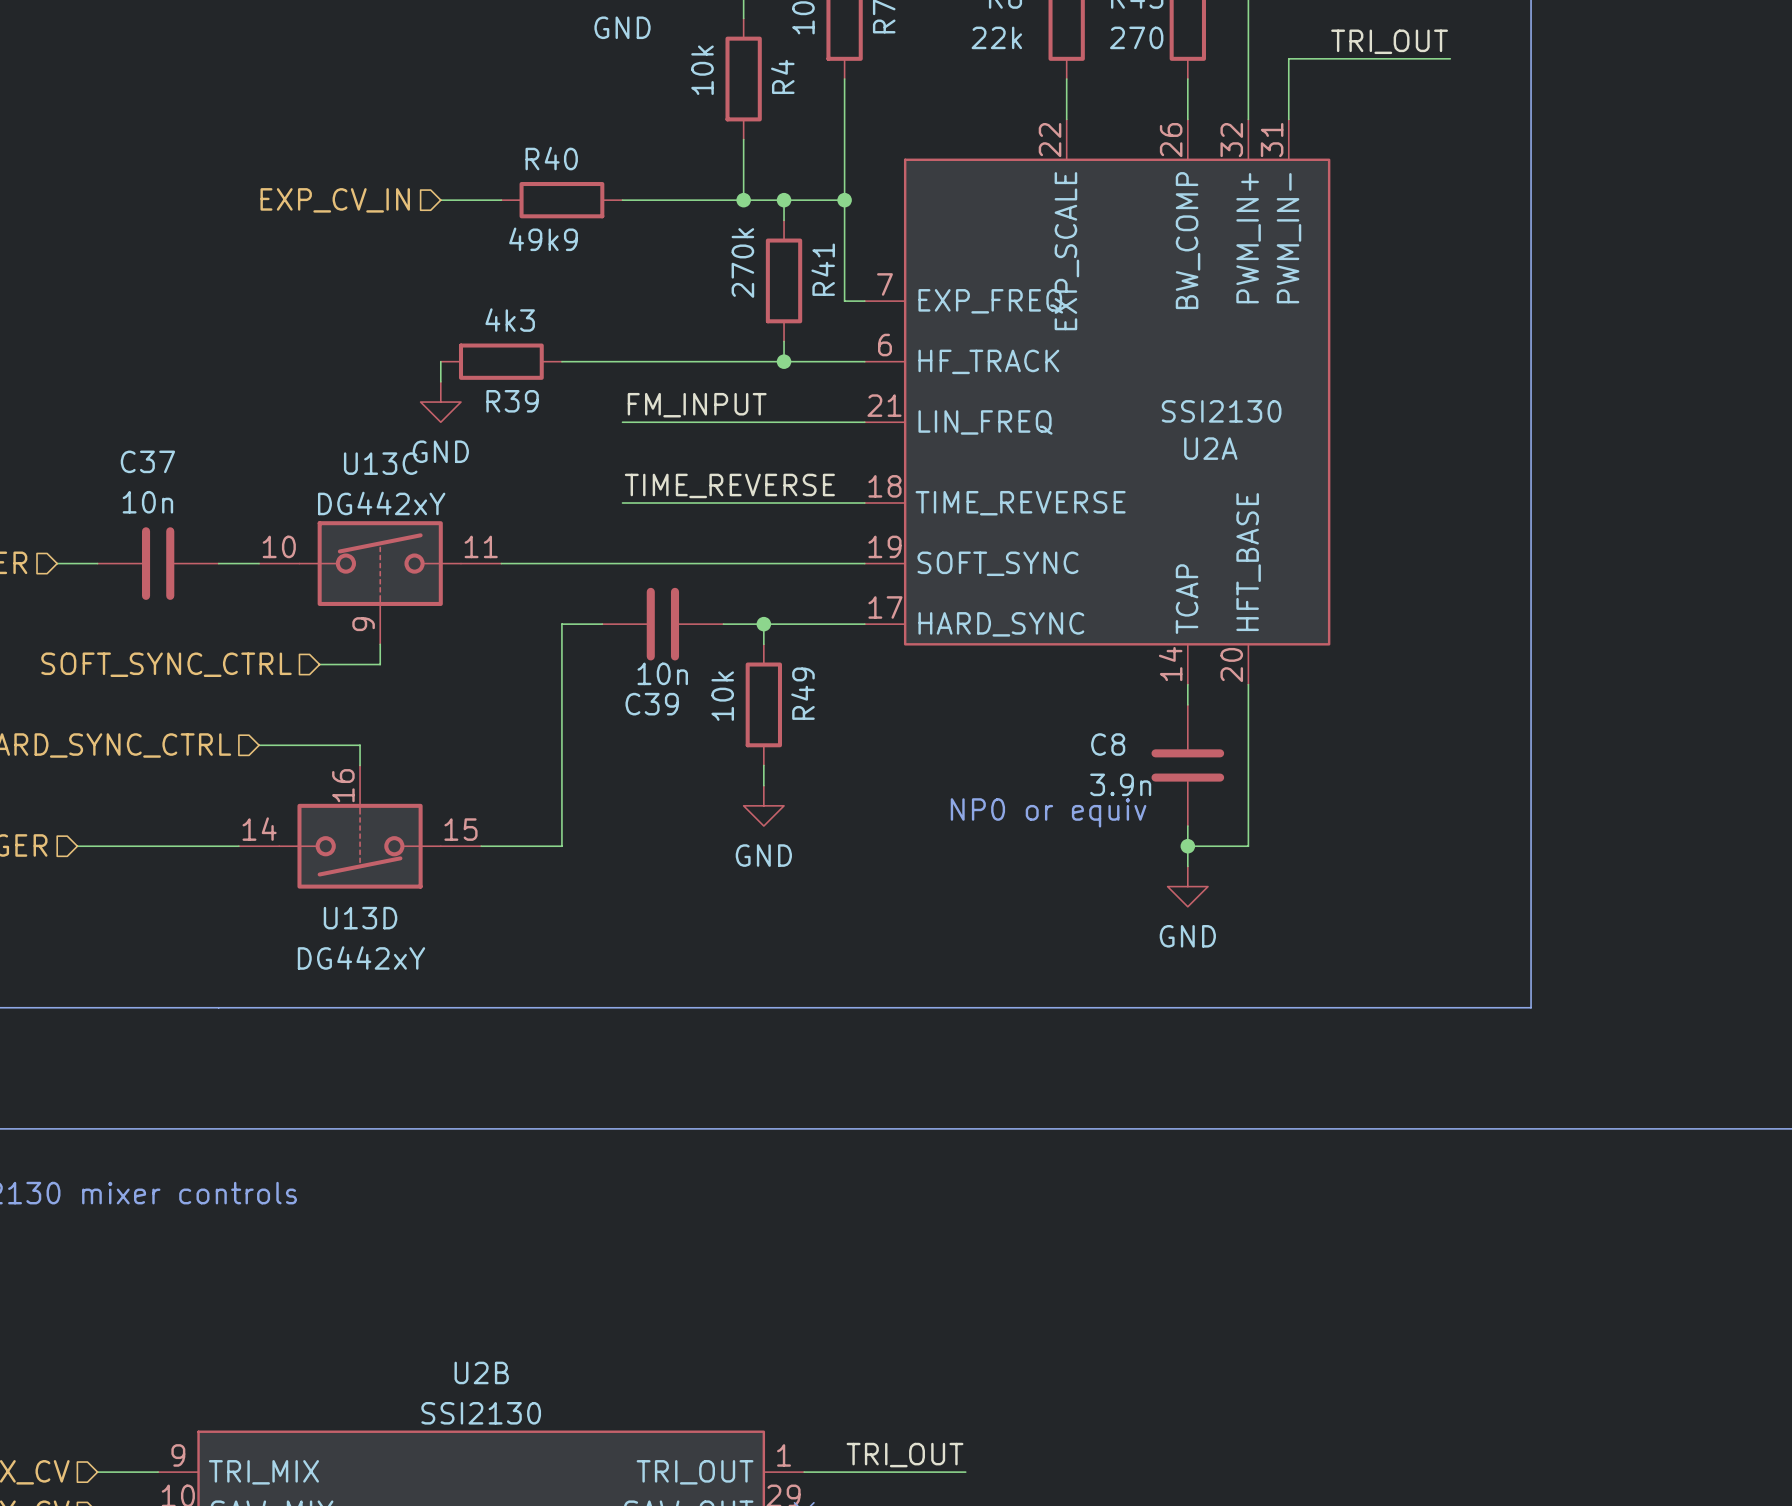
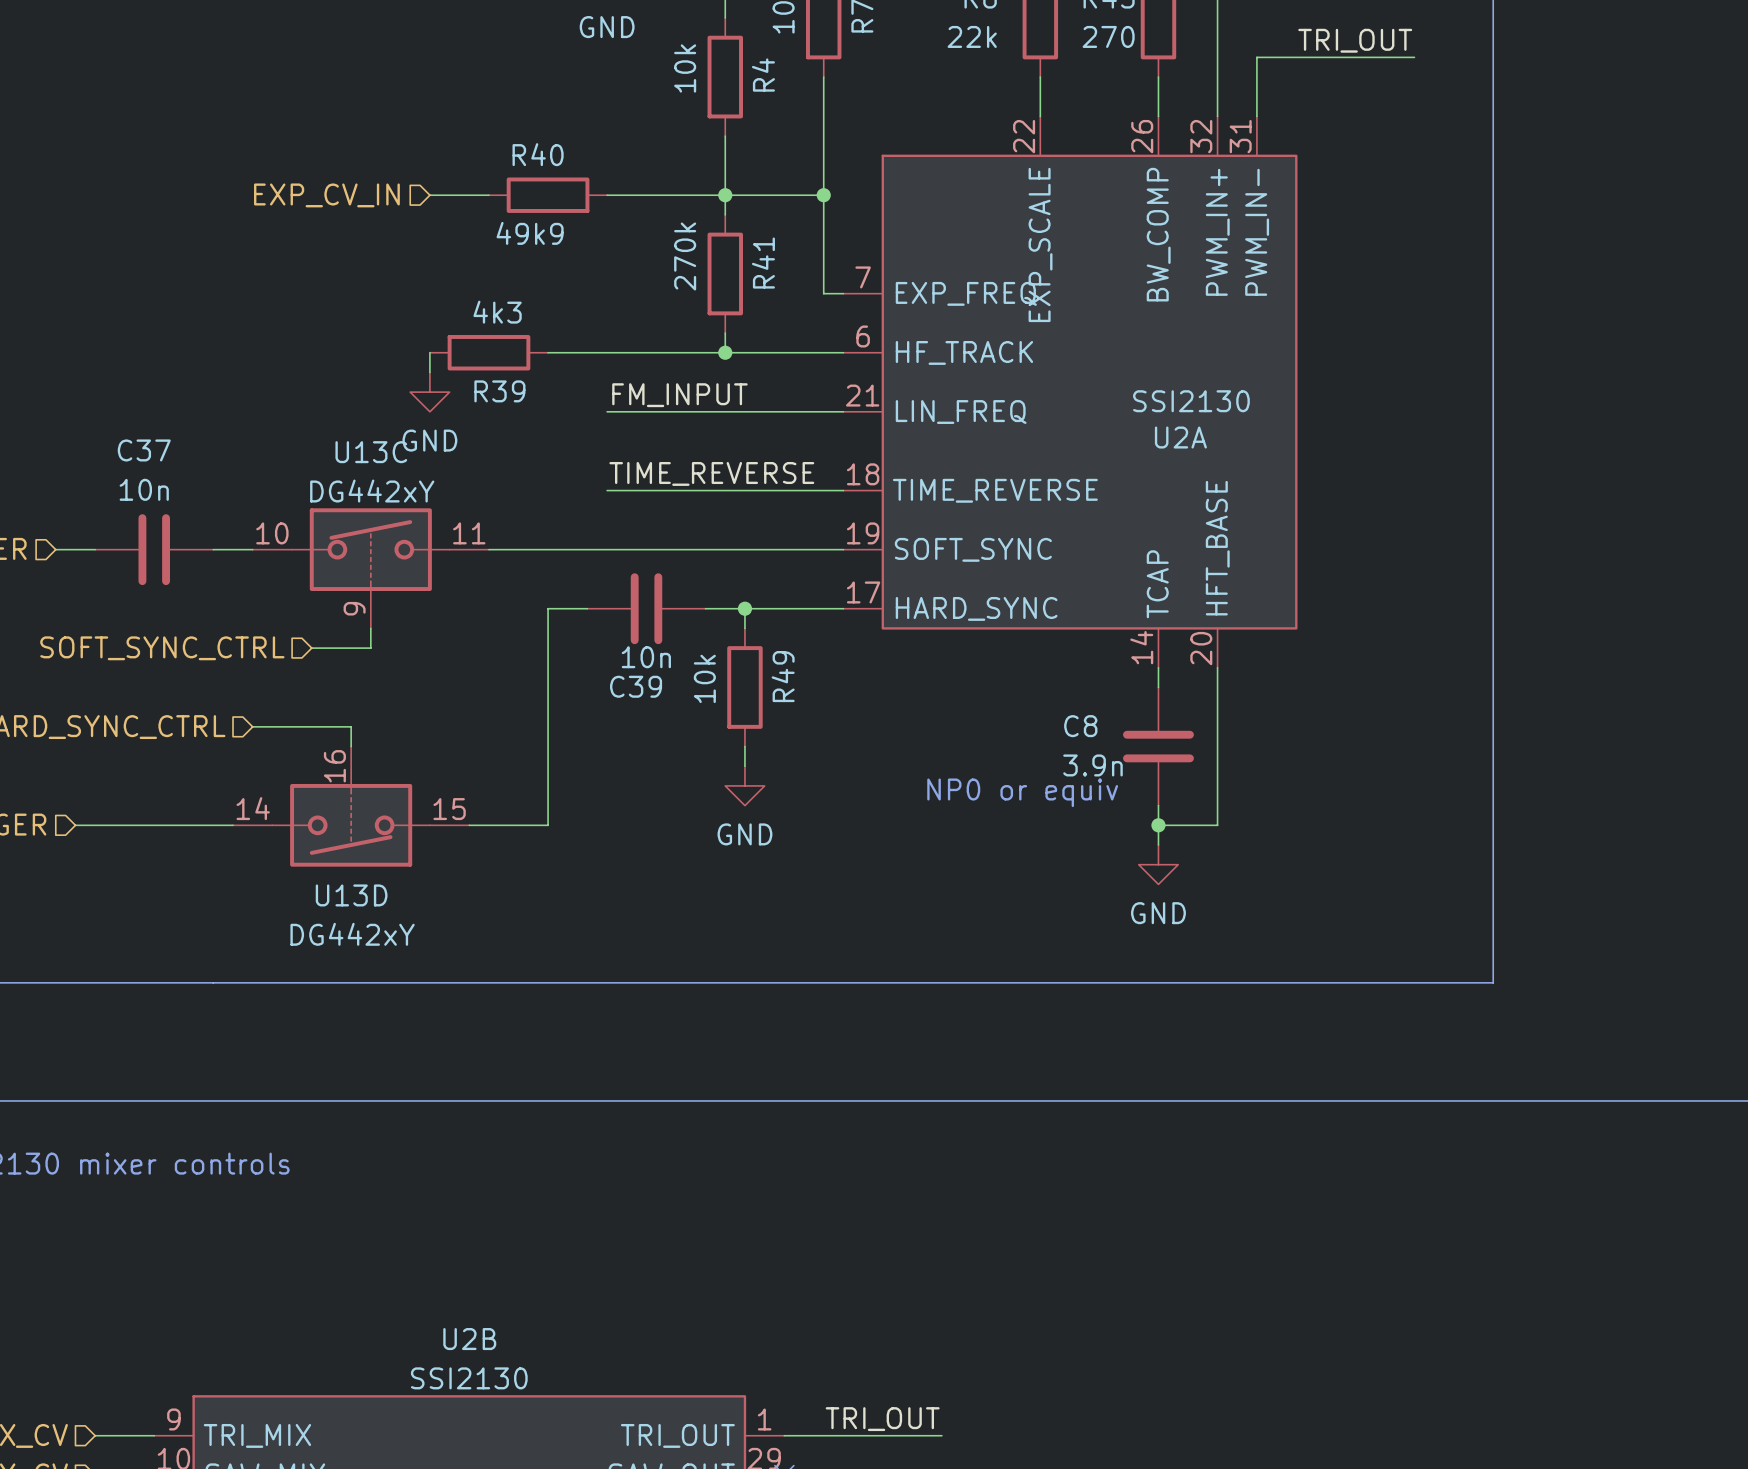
wire: (784, 200) (784, 220) -> (725, 195) (725, 214)
junction: (784, 200) -> none
R41 position: (784, 280) -> (725, 273)
wire: (784, 341) (784, 361) -> (725, 333) (725, 352)
junction position: (784, 361) -> (725, 352)

